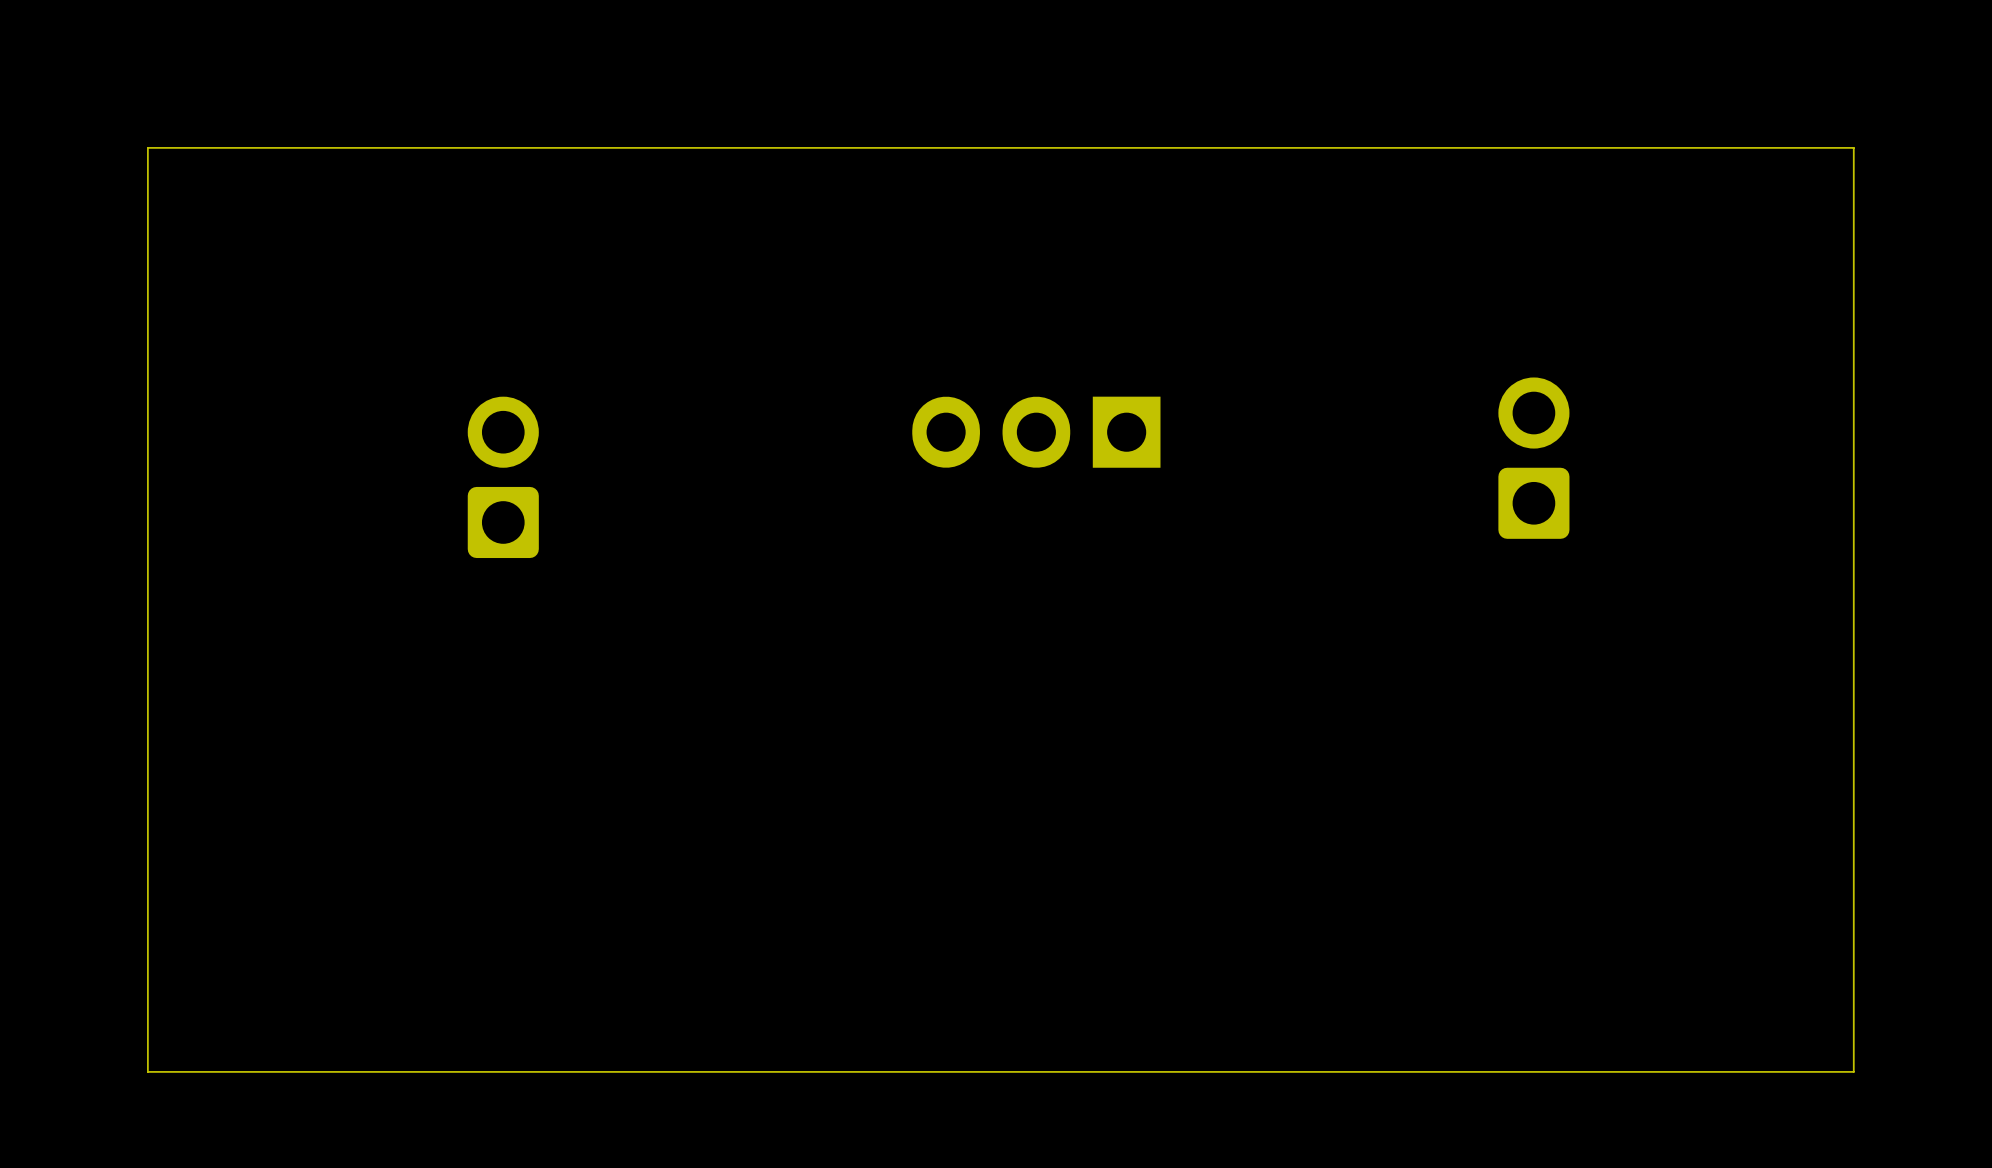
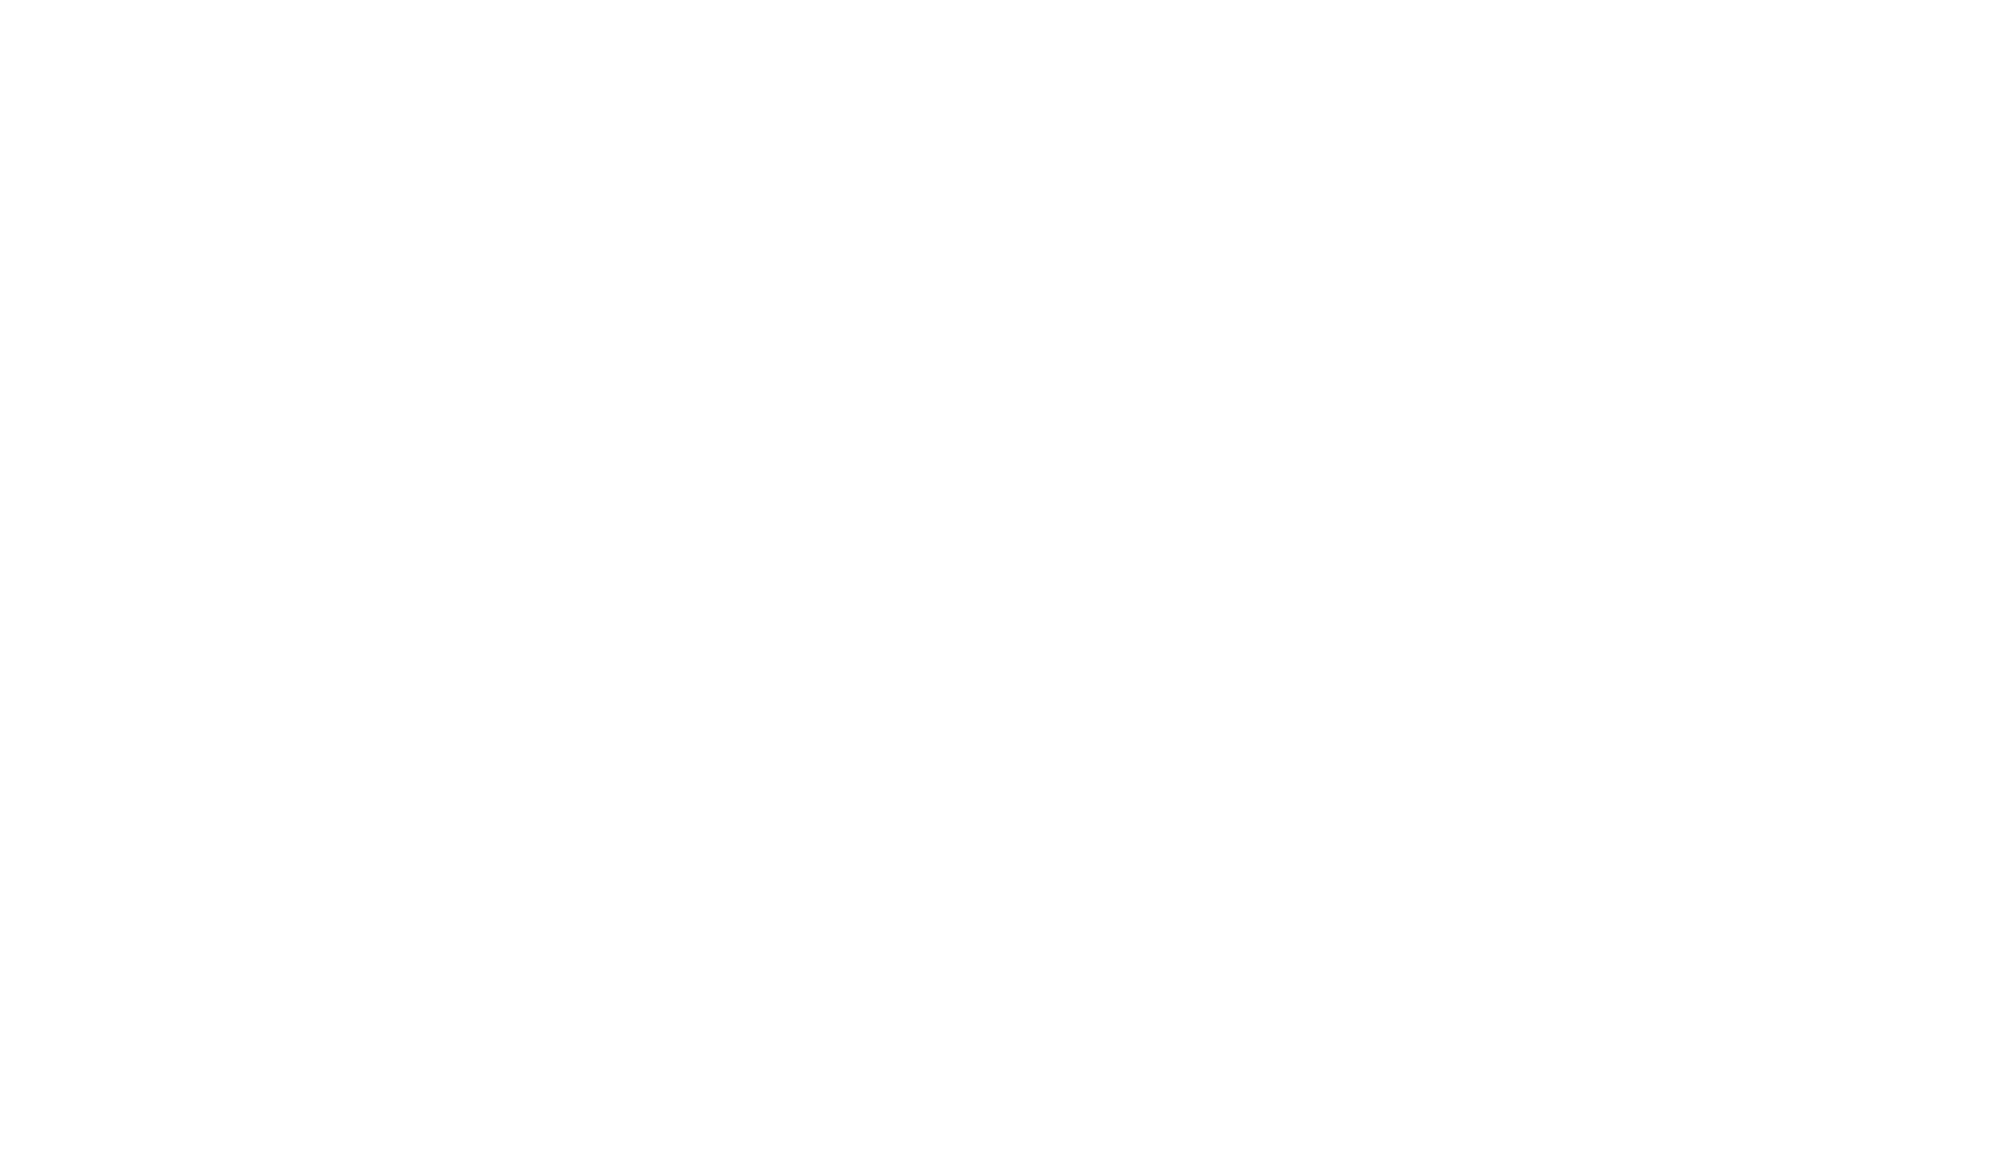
board edge: (1853, 147) (147, 147) (147, 1071) (1853, 1071) (1853, 147) -> none
part: (1036, 432) -> none
part: (1533, 458) -> none
part: (503, 477) -> none

